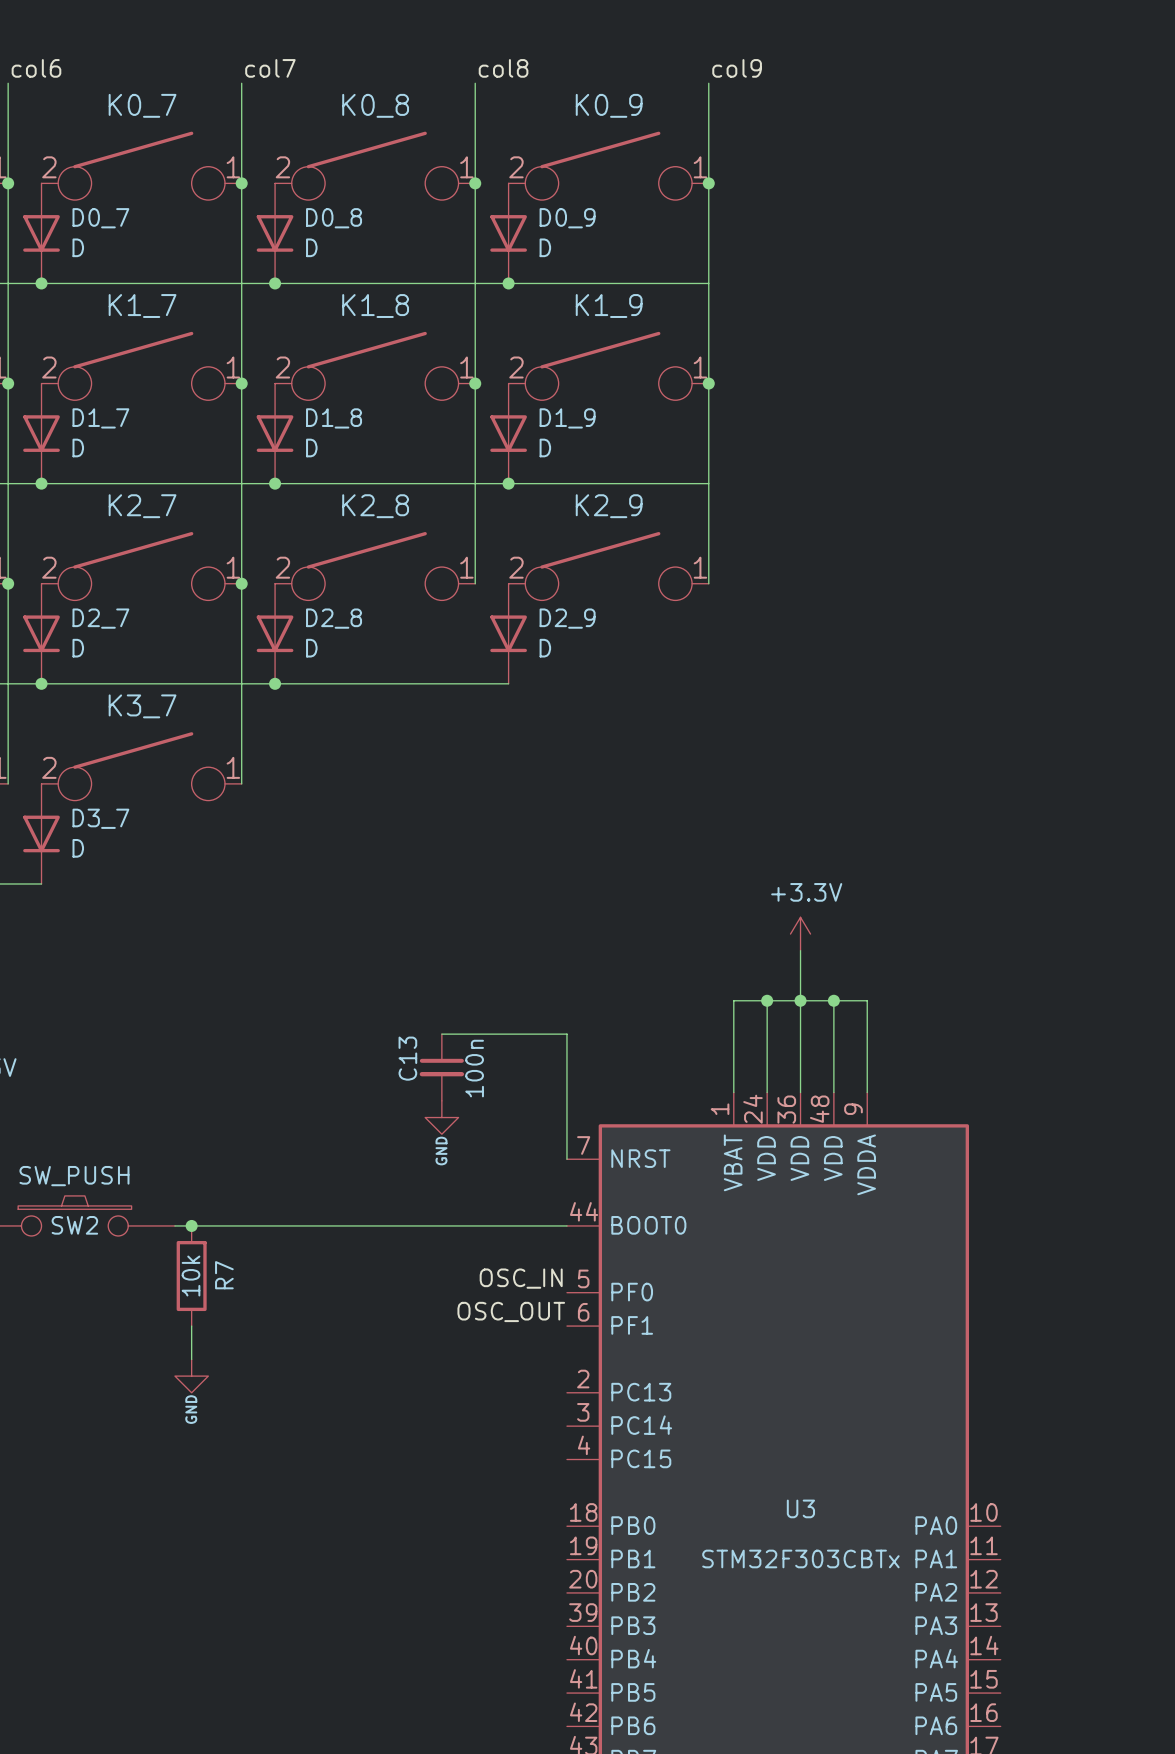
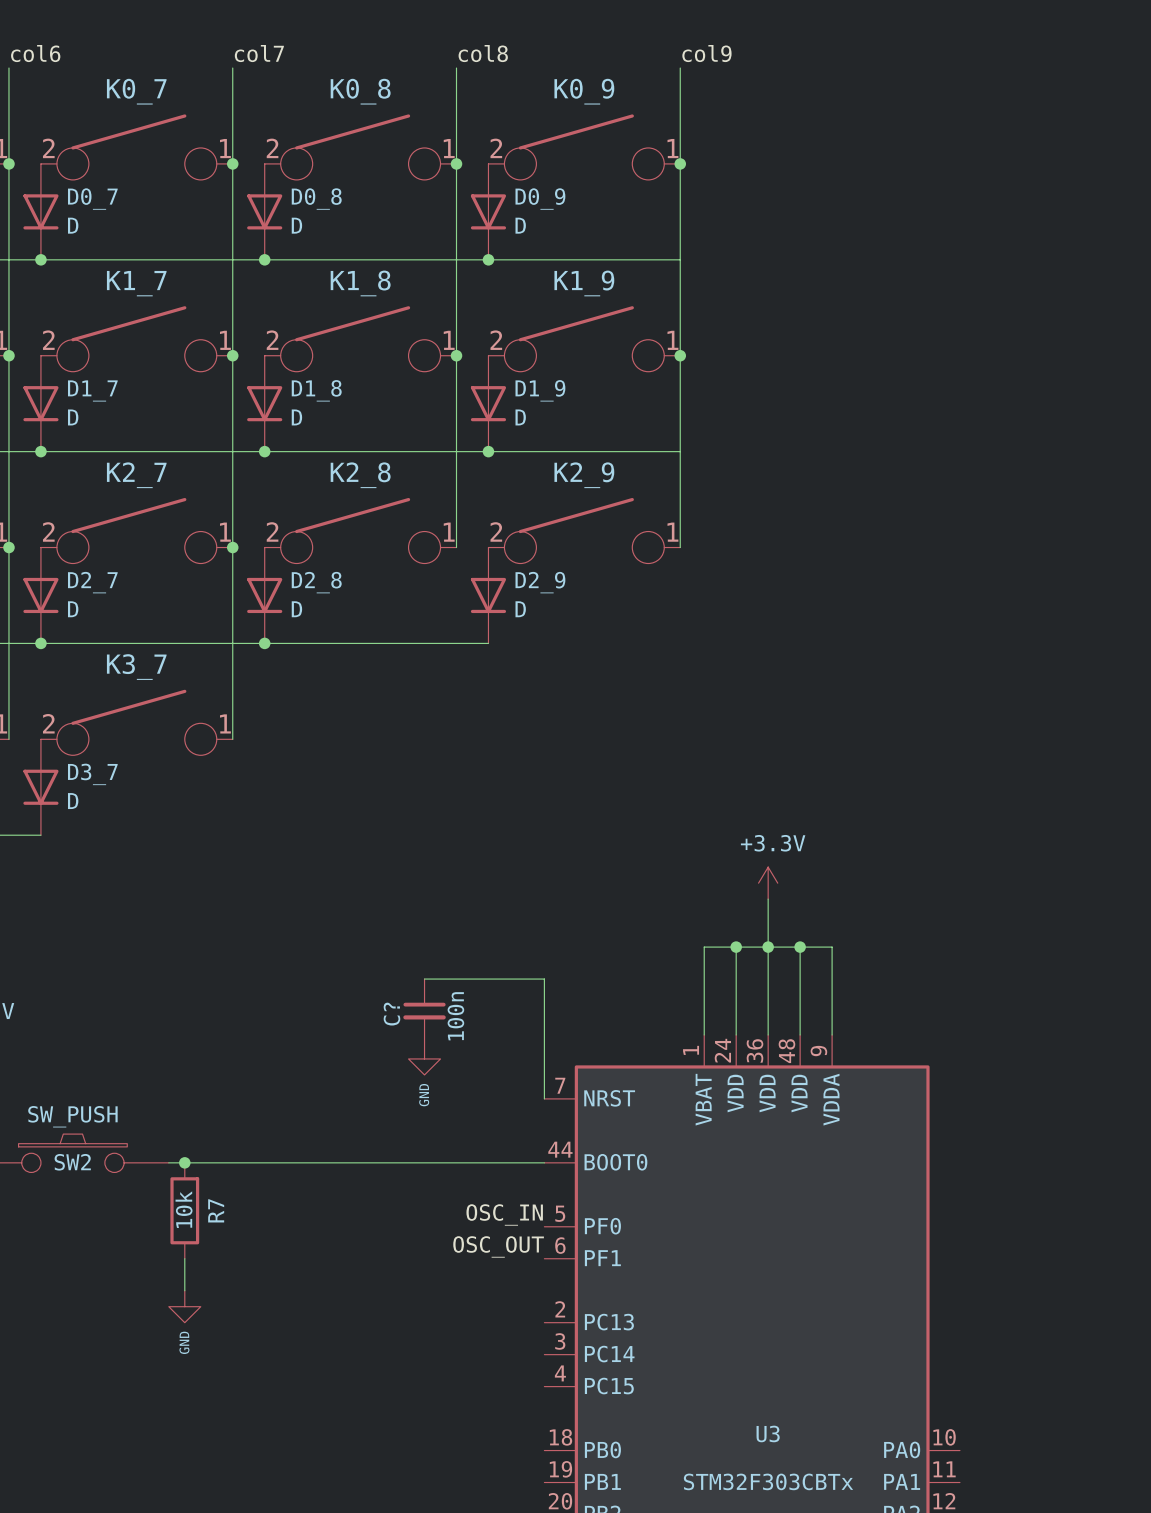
C13 name: C13 (407, 1058) -> C? (391, 1014)

